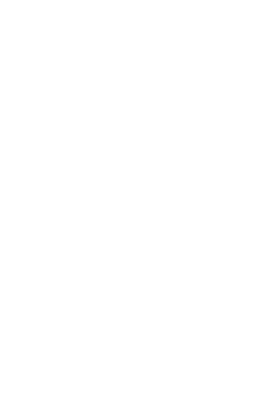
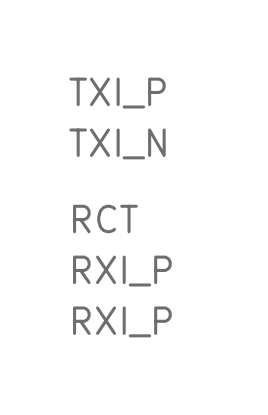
label: none -> TXI_P (117, 93)
label: none -> TXI_N (117, 143)
label: none -> RCT (105, 218)
label: none -> RXI_P (122, 271)
label: none -> RXI_P (122, 321)

